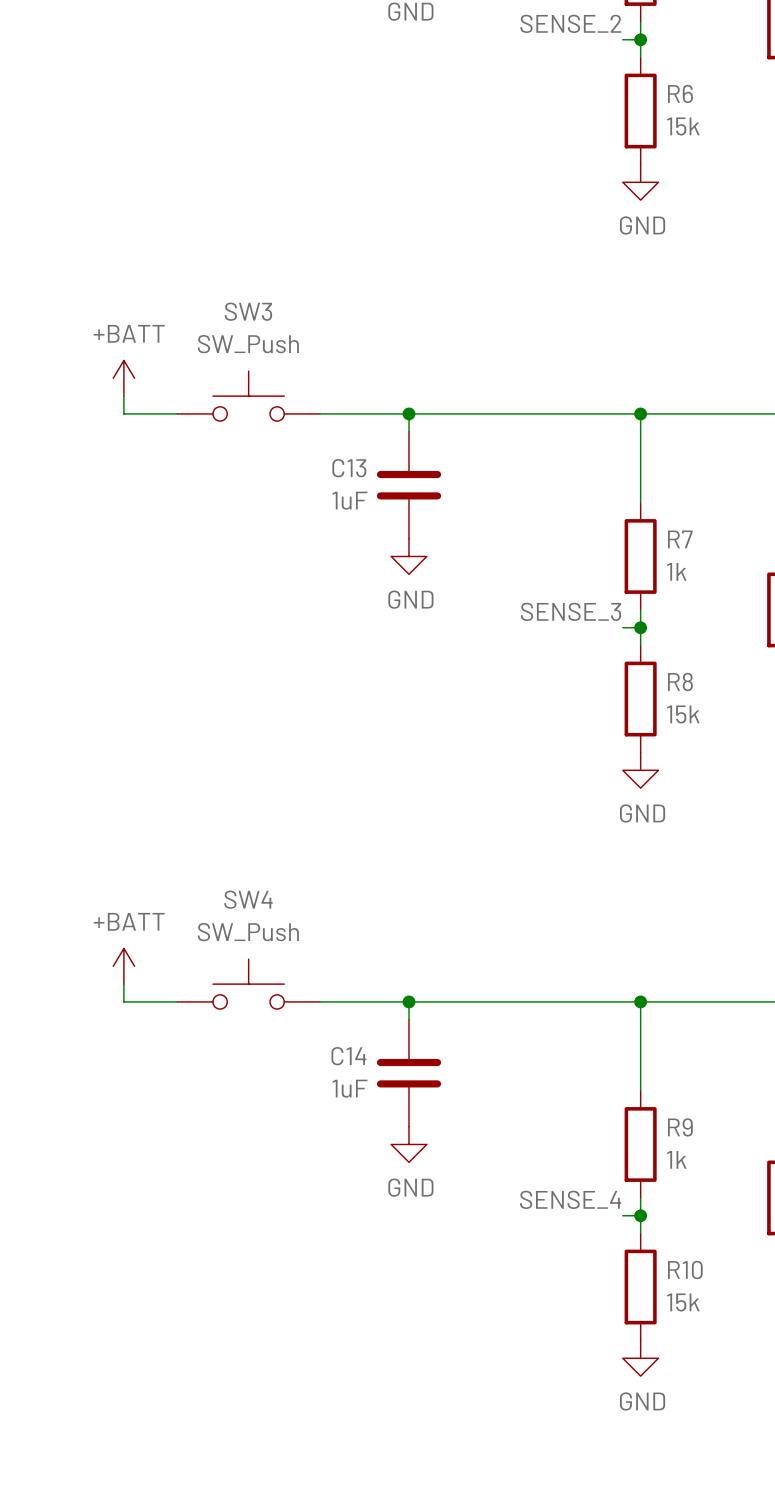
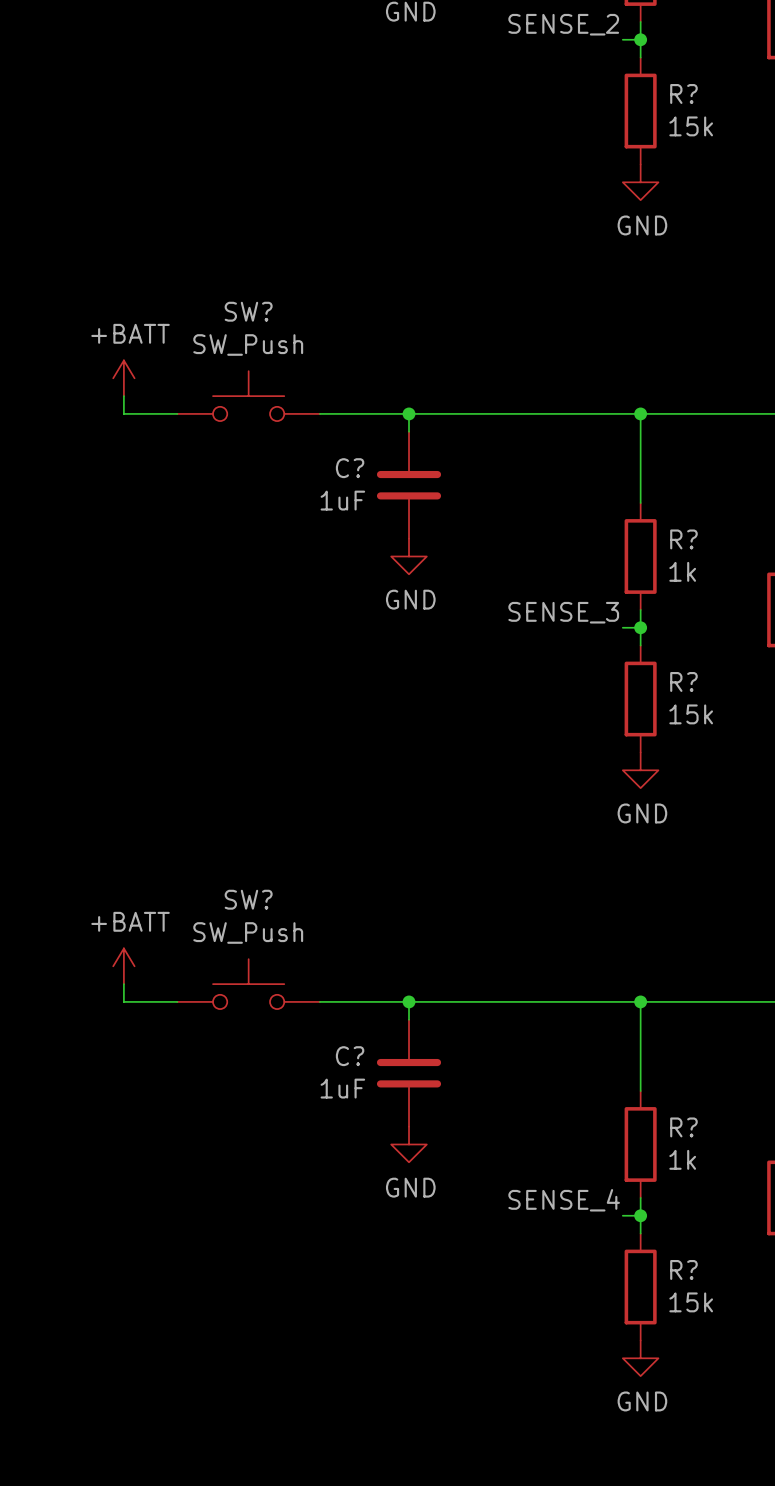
R6 name: R6 (680, 93) -> R? (683, 93)
SW3 name: SW3 (248, 311) -> SW? (248, 311)
C13 name: C13 (349, 468) -> C? (350, 468)
R7 name: R7 (680, 539) -> R? (683, 539)
R8 name: R8 (680, 681) -> R? (683, 681)
SW4 name: SW4 (248, 899) -> SW? (248, 899)
C14 name: C14 (348, 1056) -> C? (350, 1056)
R9 name: R9 (680, 1127) -> R? (683, 1127)
R10 name: R10 (685, 1269) -> R? (683, 1269)

